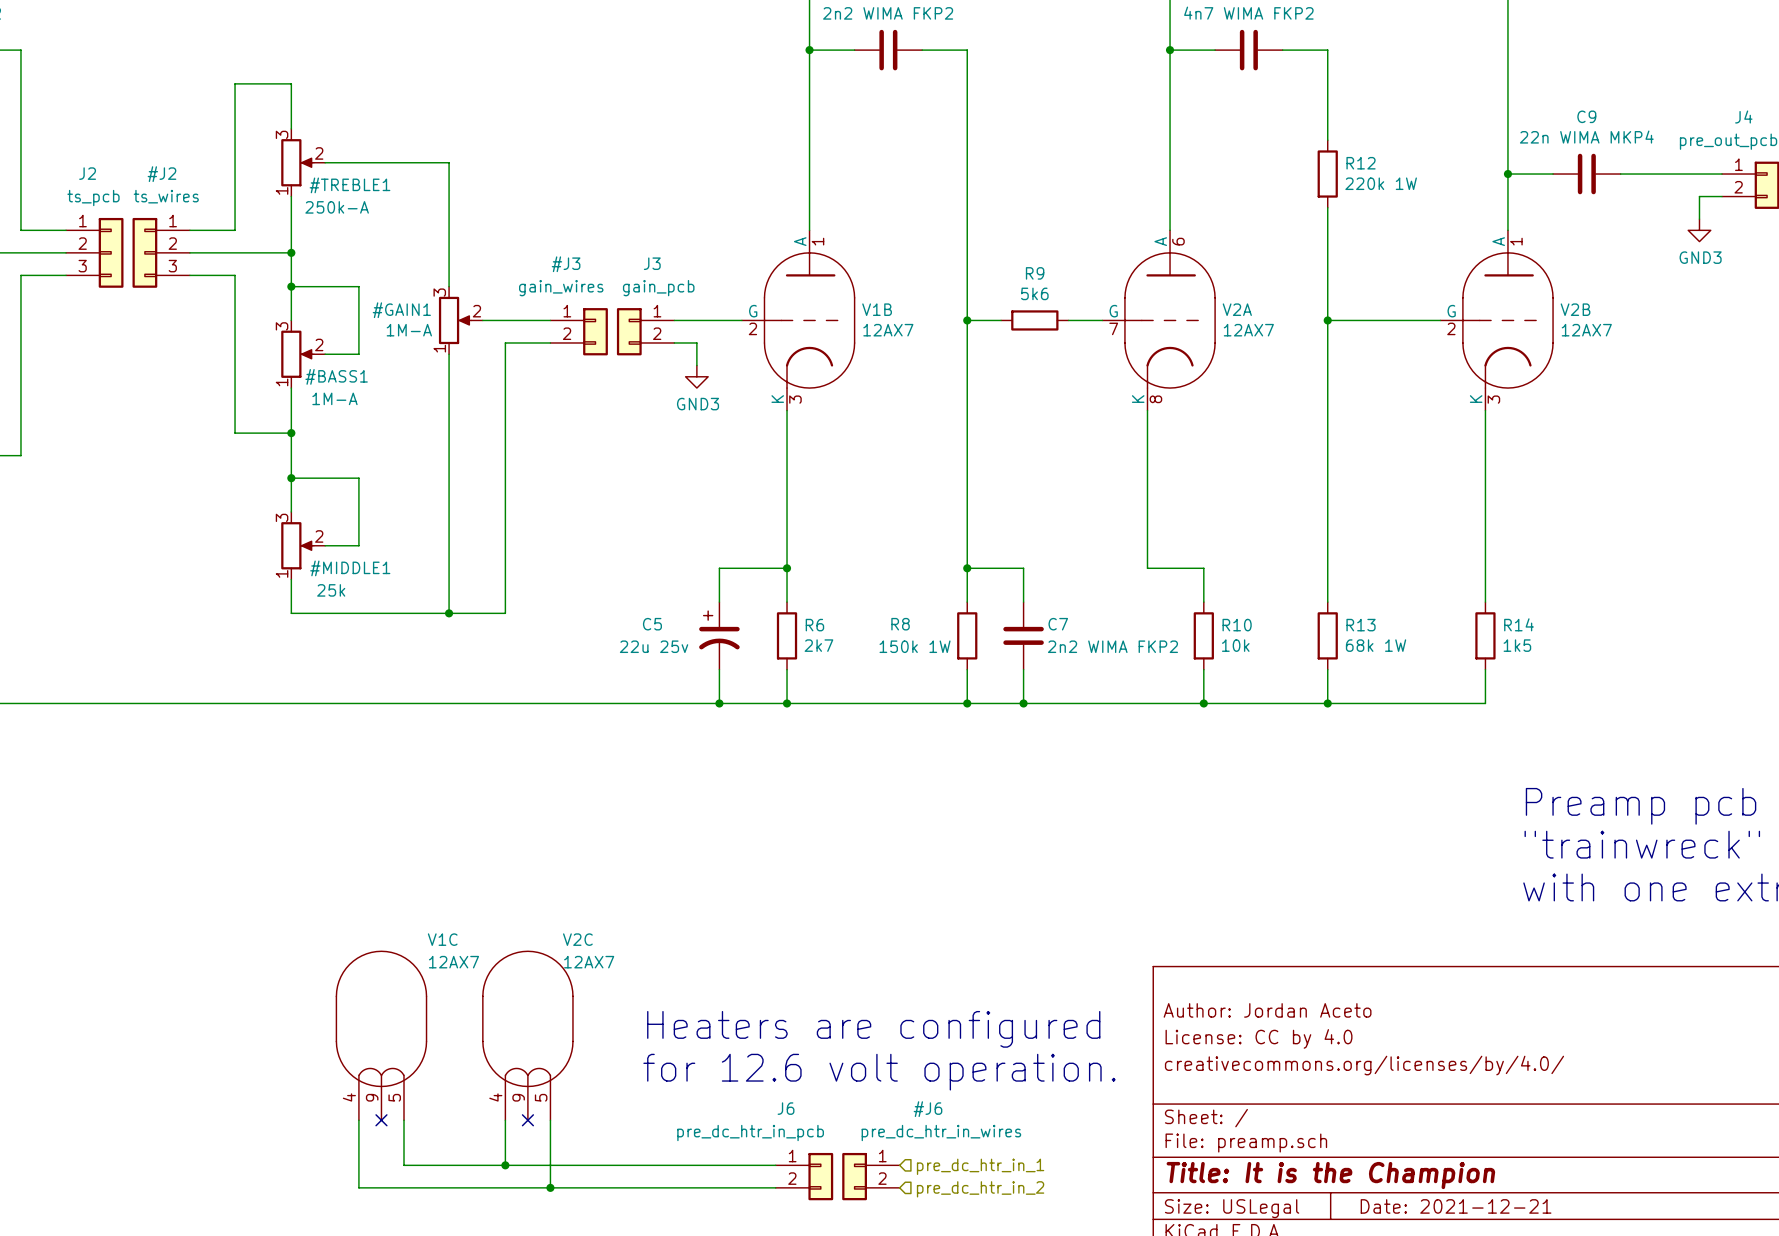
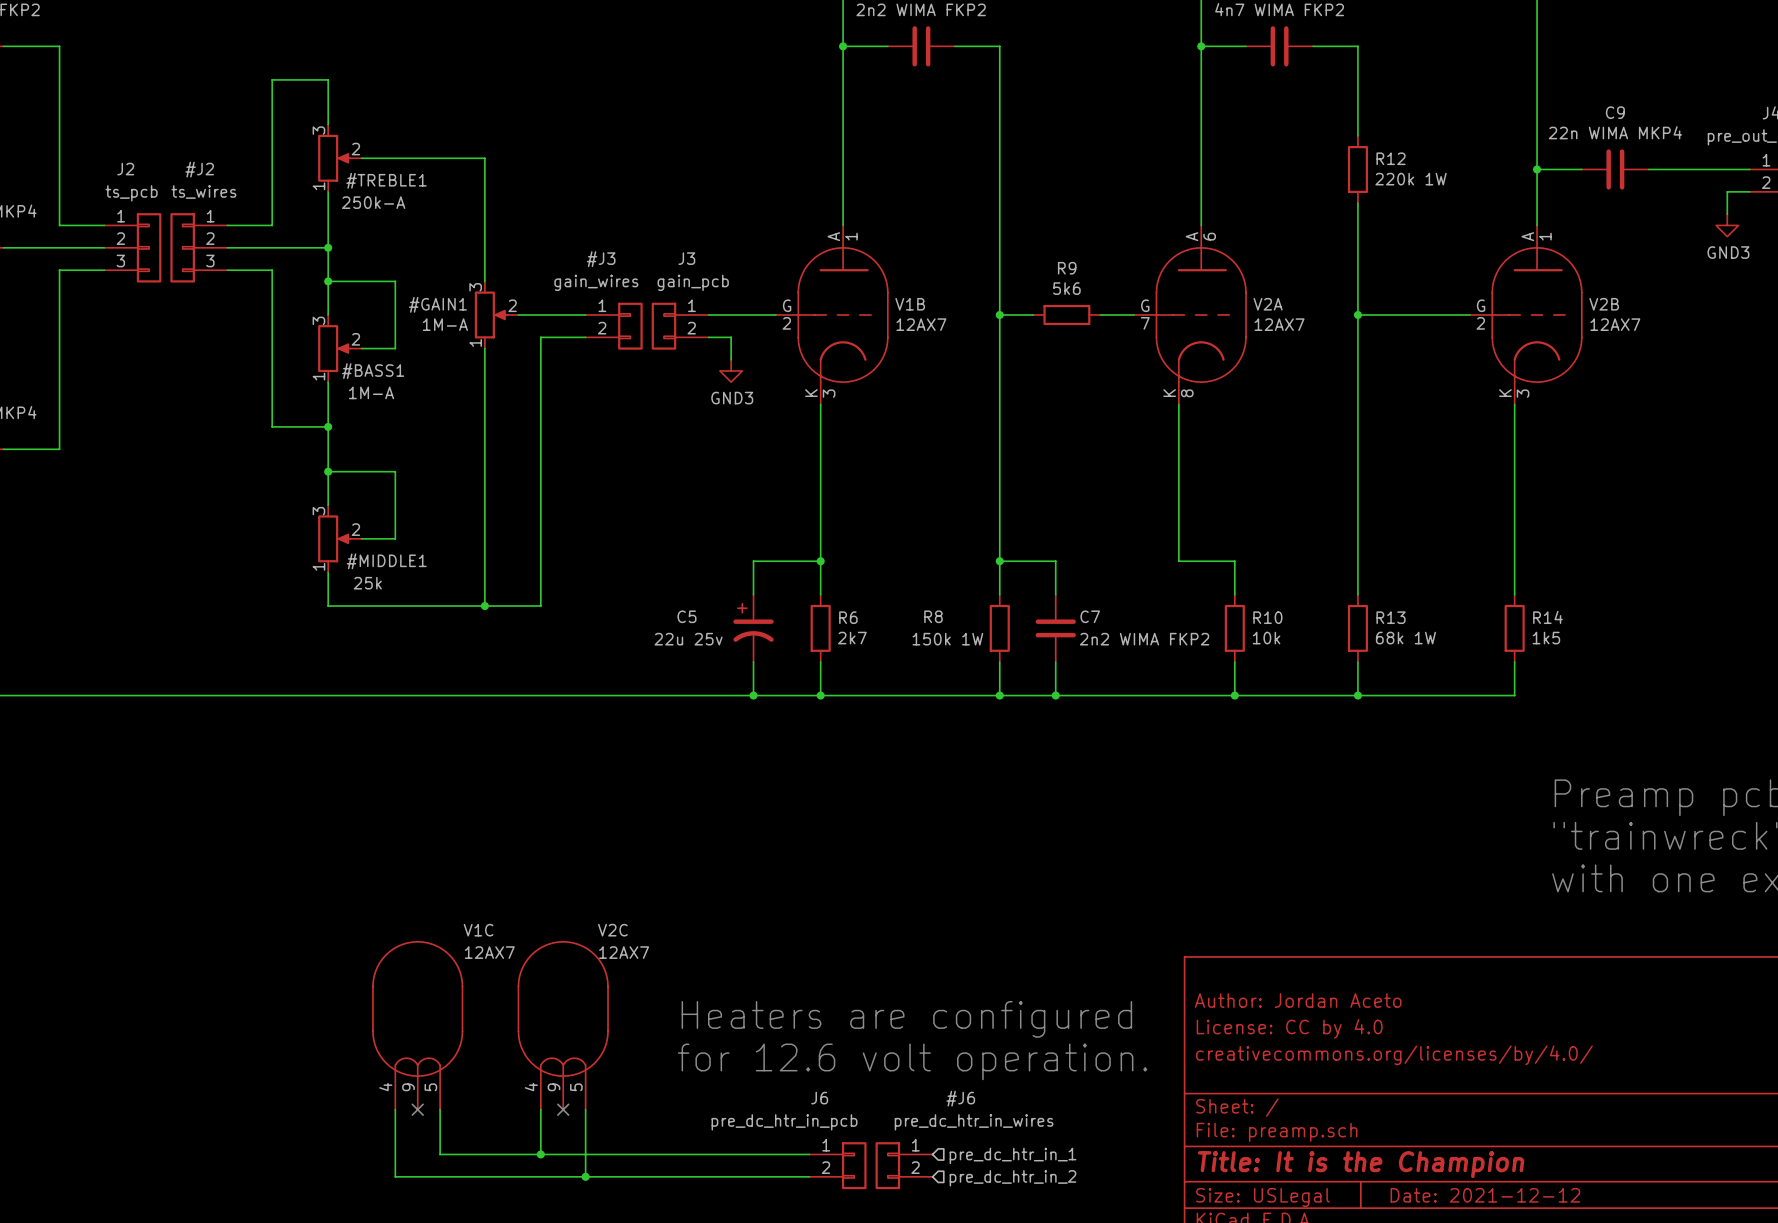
title block: Date: 2021-12-21 (1456, 1206) -> Date: 2021-12-12 (1485, 1195)

